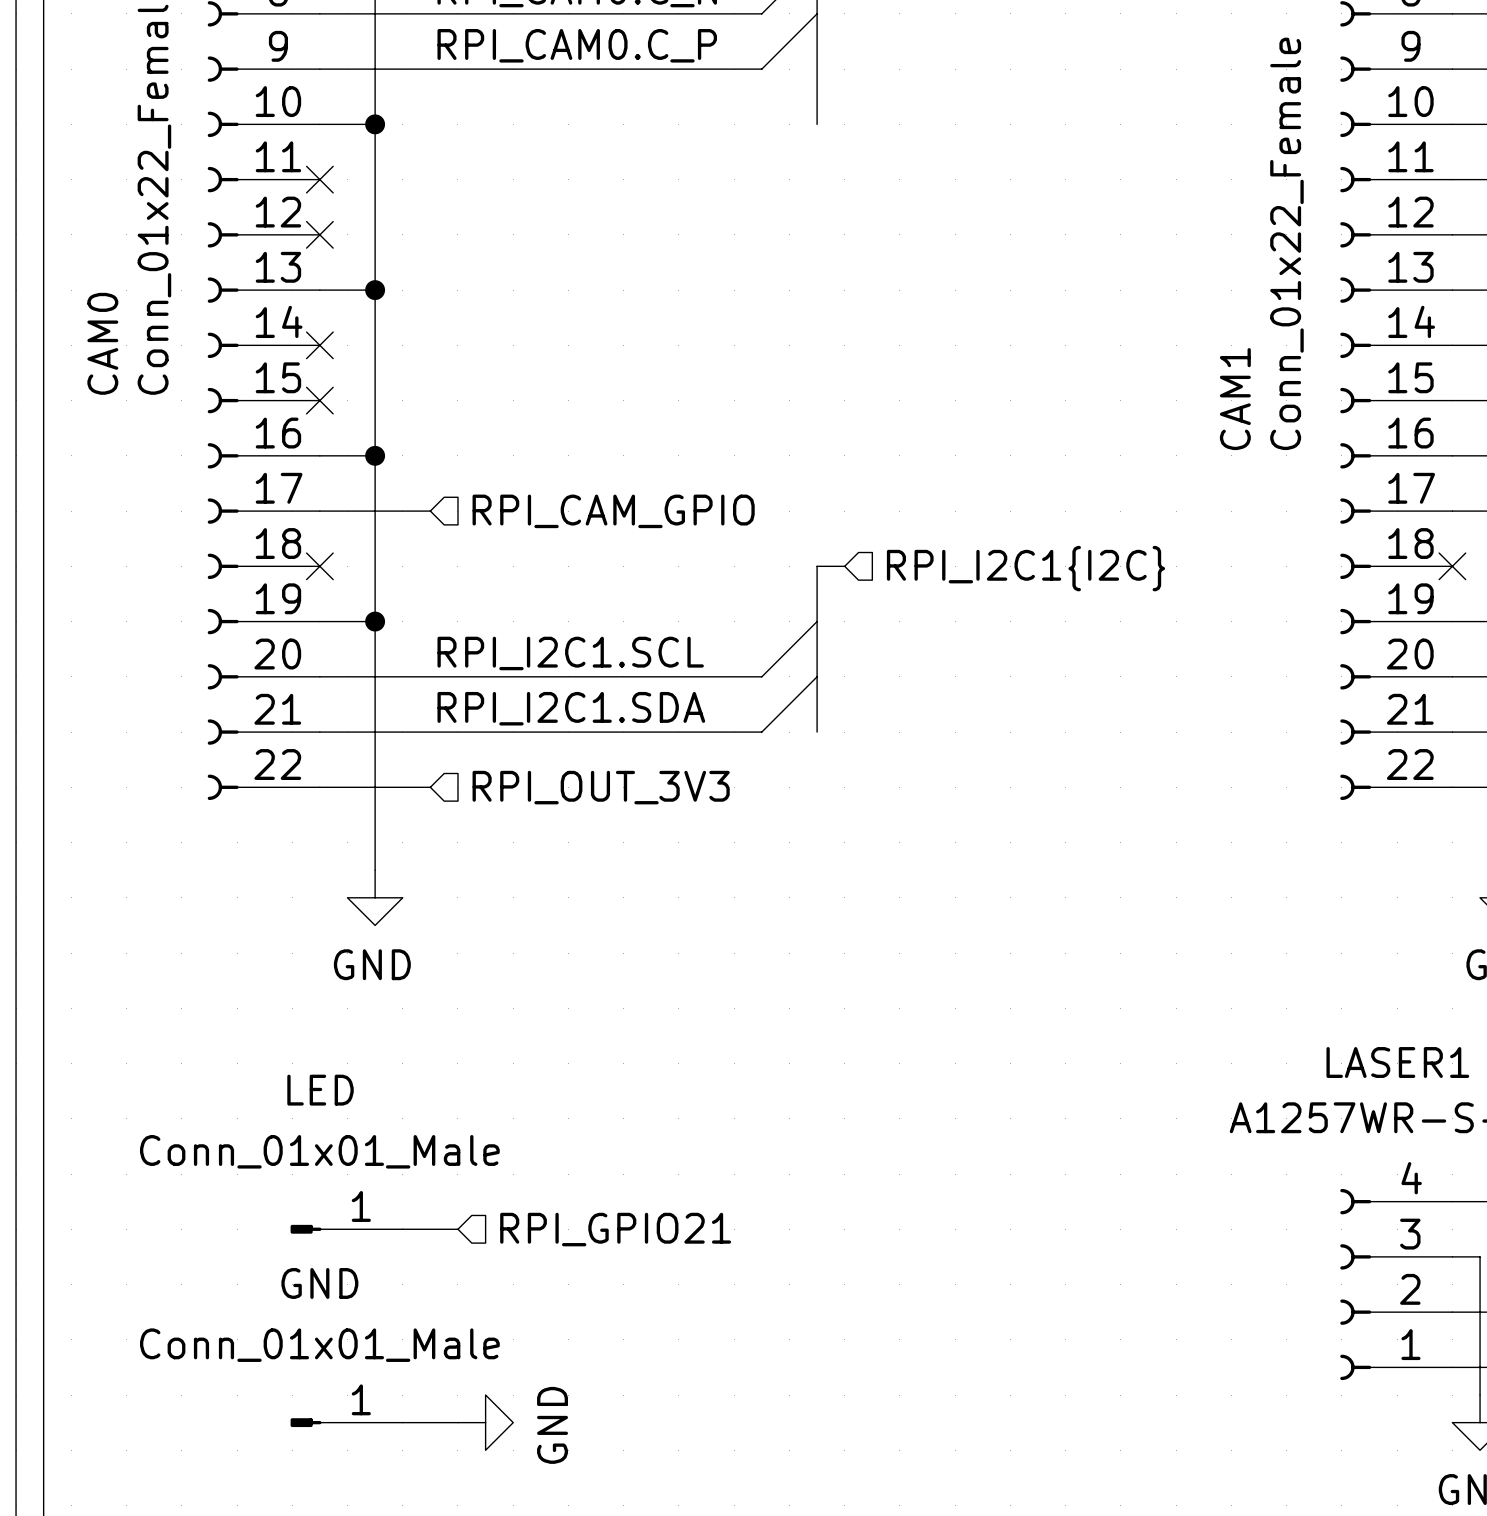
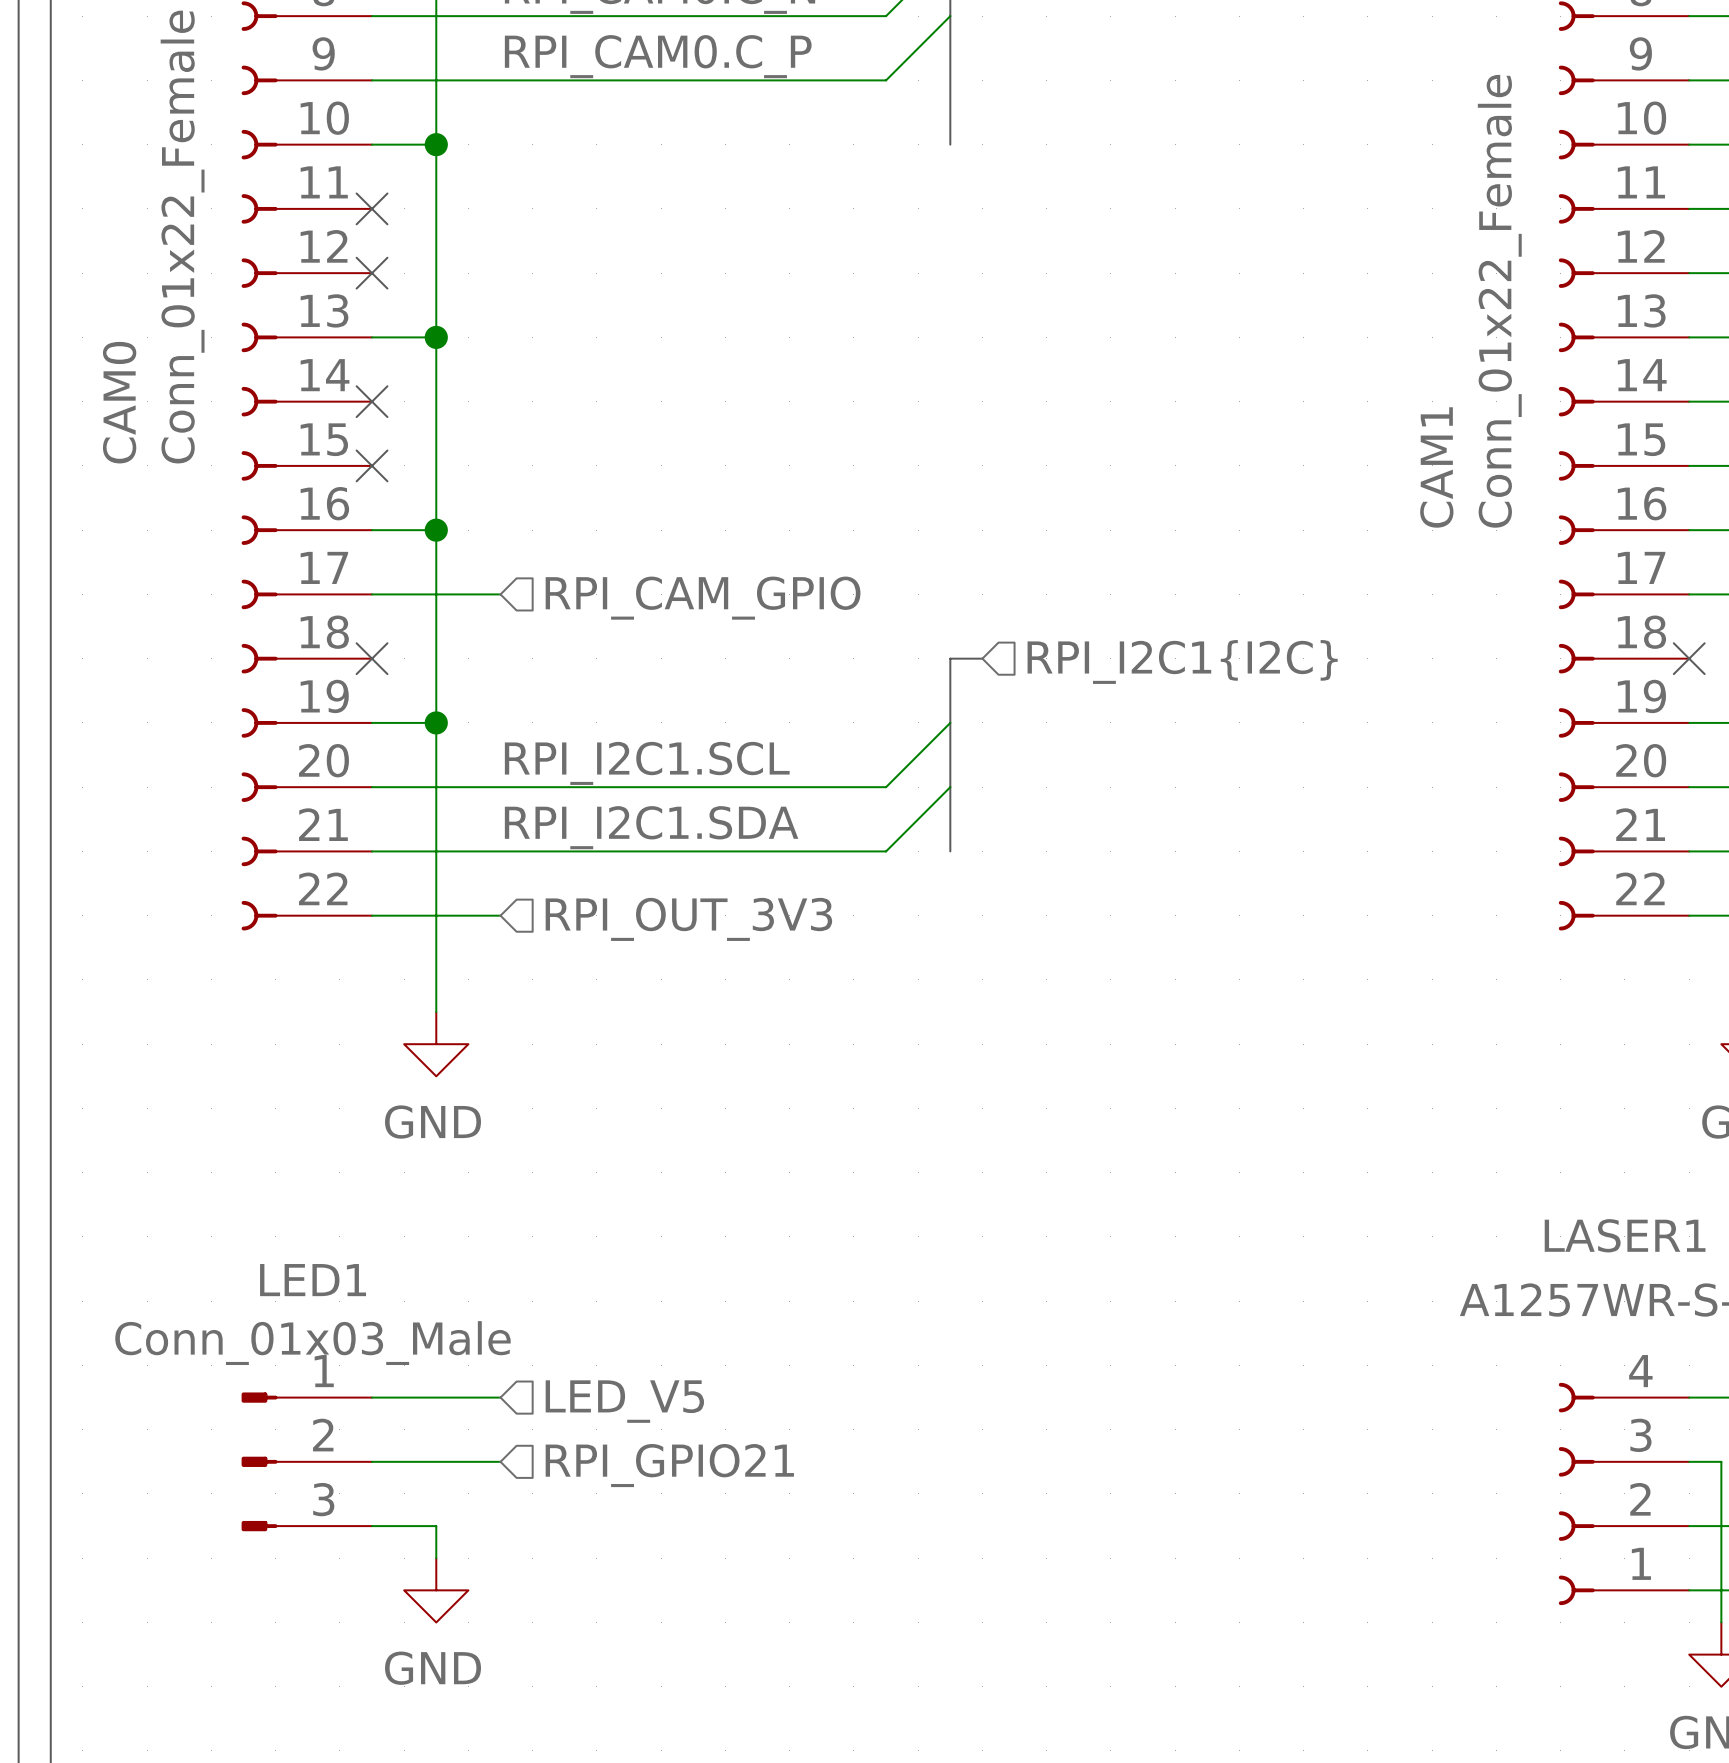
wire: none -> (372, 1397) (500, 1397)
hierarchical label: none -> LED_V5 (624, 1401)
LED: Conn_01x01_Male (346, 1229) -> none
wire: (402, 1229) (457, 1229) -> none
hierarchical label position: RPI_GPIO21 (615, 1229) -> RPI_GPIO21 (669, 1465)
LED1: none -> Conn_01x03_Male (306, 1461)
wire: none -> (372, 1461) (500, 1461)
wire: none -> (372, 1526) (436, 1526) (436, 1558)
GND: Conn_01x01_Male (346, 1422) -> none
wire: (402, 1422) (457, 1422) -> none
power symbol rotation: 0° (485, 1422) -> 90° clockwise (436, 1590)
power symbol position: GND (485, 1422) -> GND (436, 1590)

